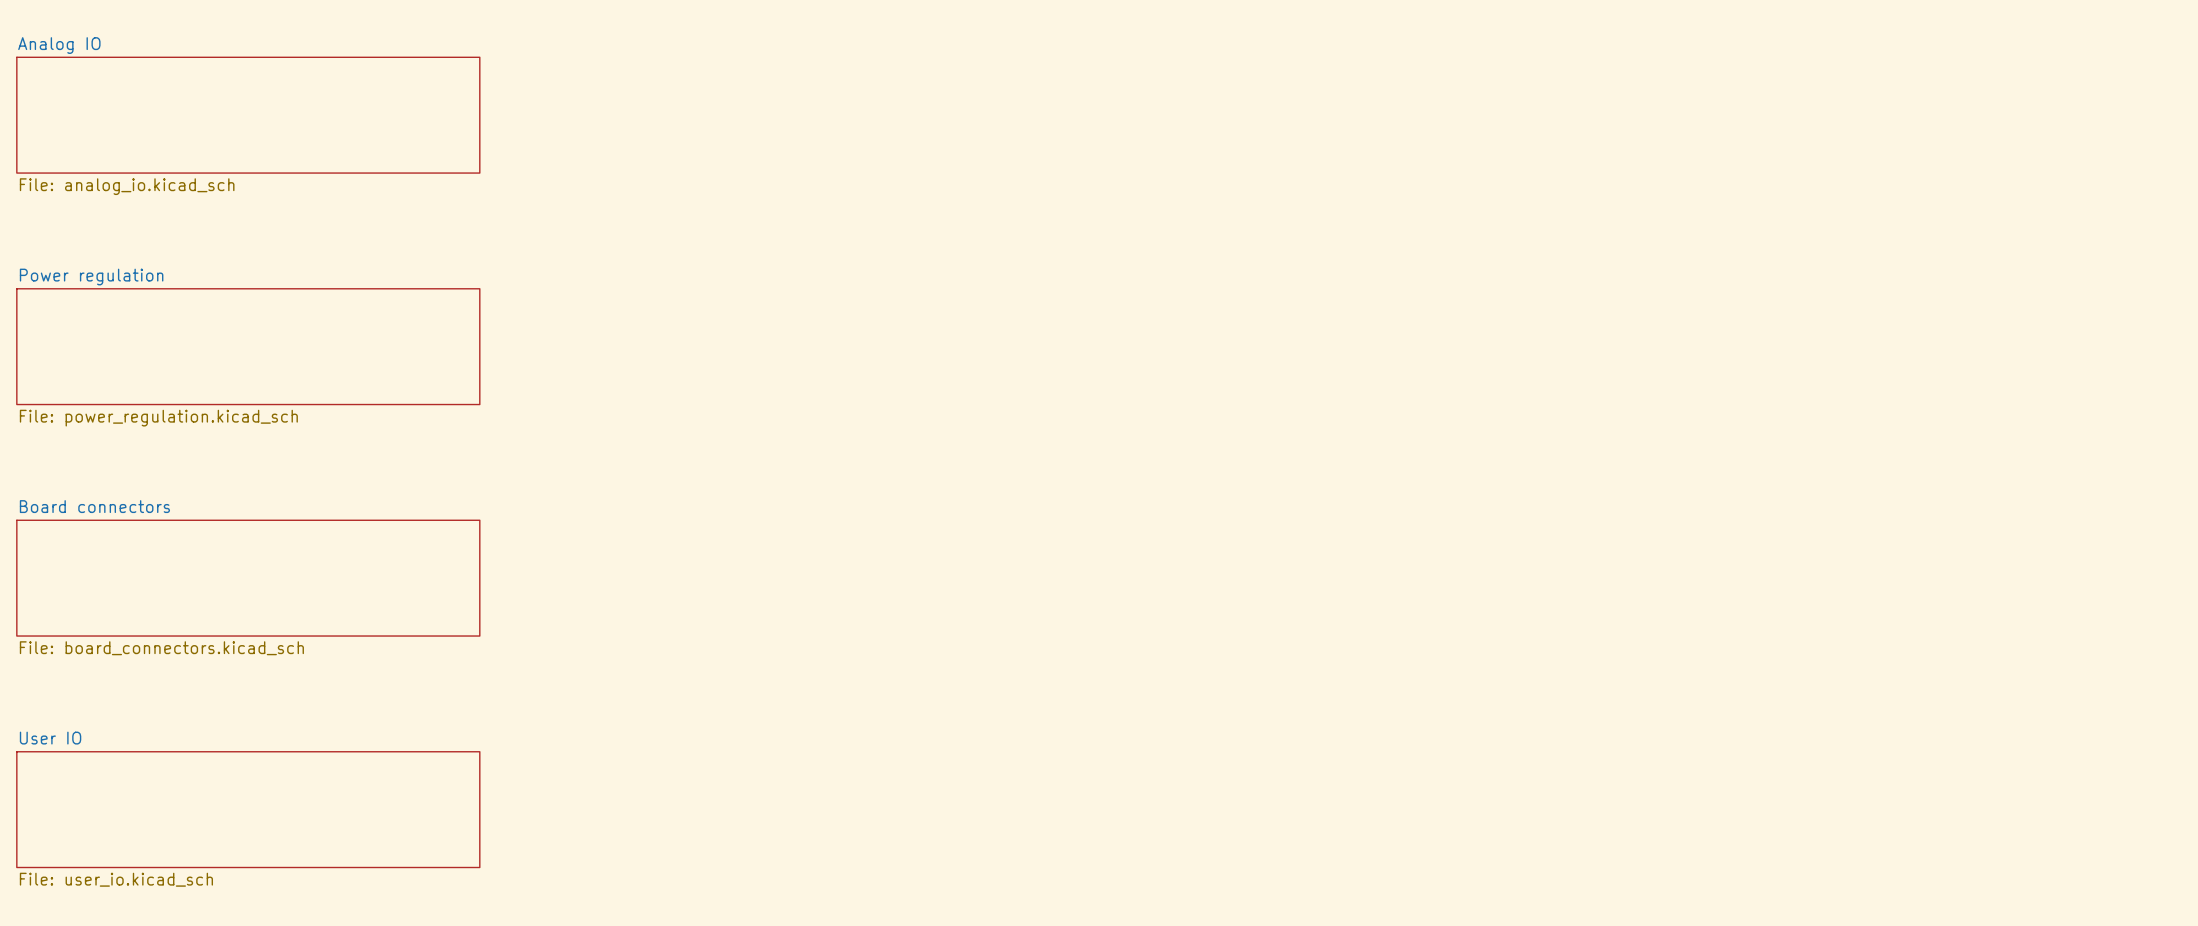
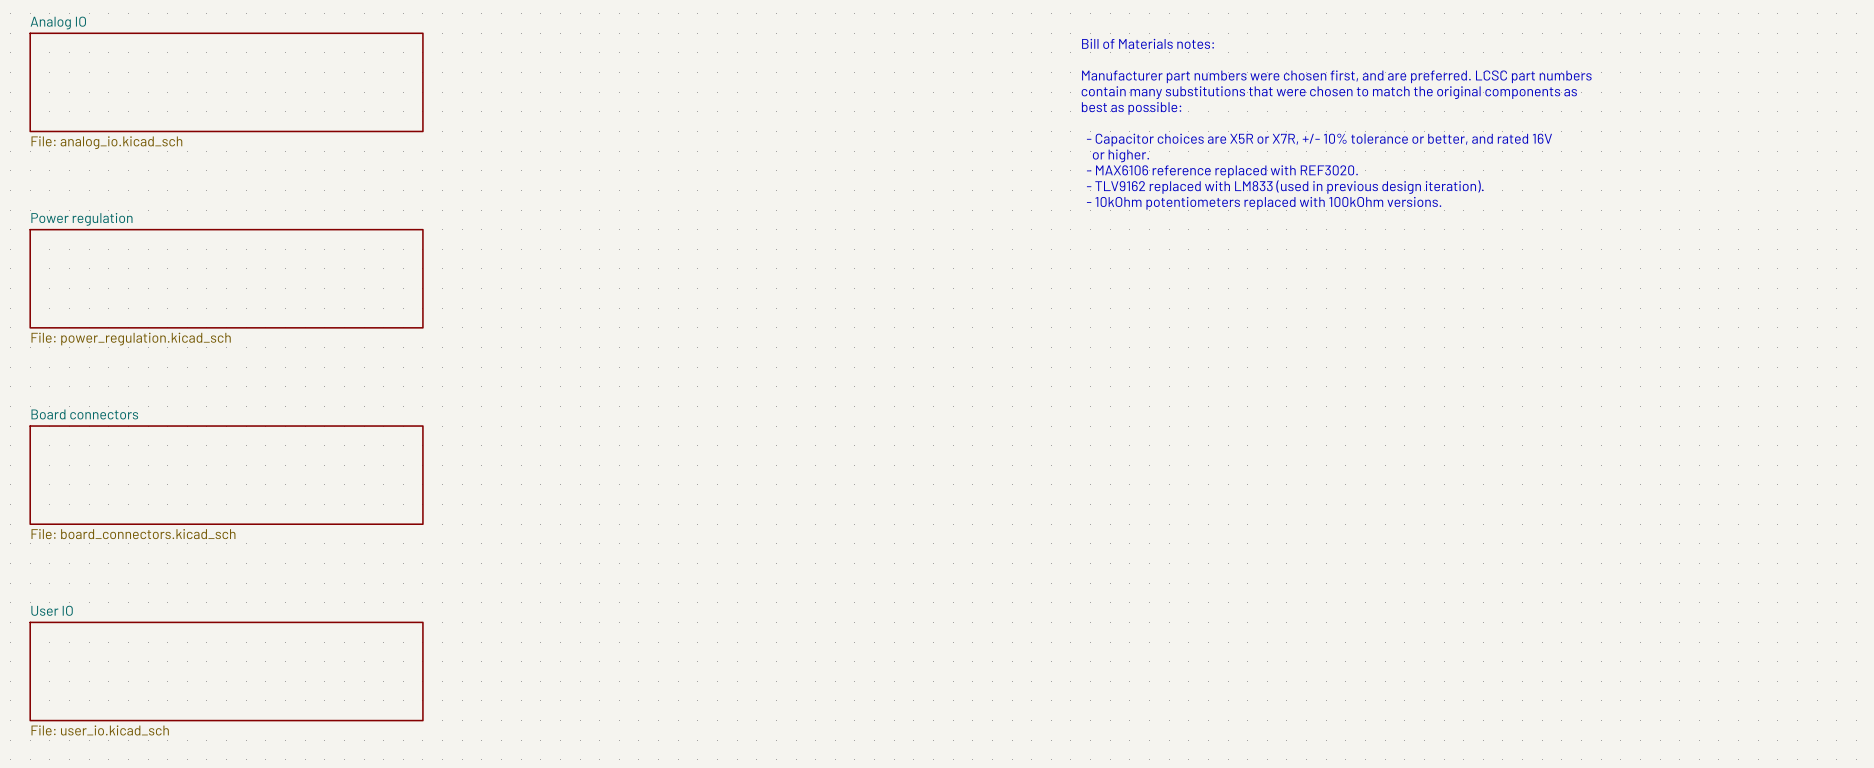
text: none -> Bill of Materials notes: (1148, 43)
text: none -> Manufacturer part numbers were chosen first, and are preferred. LCSC part numbers (1336, 76)
text: none -> contain many substitutions that were chosen to match the original components as (1329, 92)
text: none -> best as possible: (1131, 108)
text: none -> - Capacitor choices are X5R or X7R, +/- 10% tolerance or better, and rated 16V (1319, 140)
text: none -> or higher. (1120, 155)
text: none -> - MAX6106 reference replaced with REF3020. (1222, 171)
text: none -> - TLV9162 replaced with LM833 (used in previous design iteration). (1285, 187)
text: none -> - 10kOhm potentiometers replaced with 100kOhm versions. (1264, 203)

